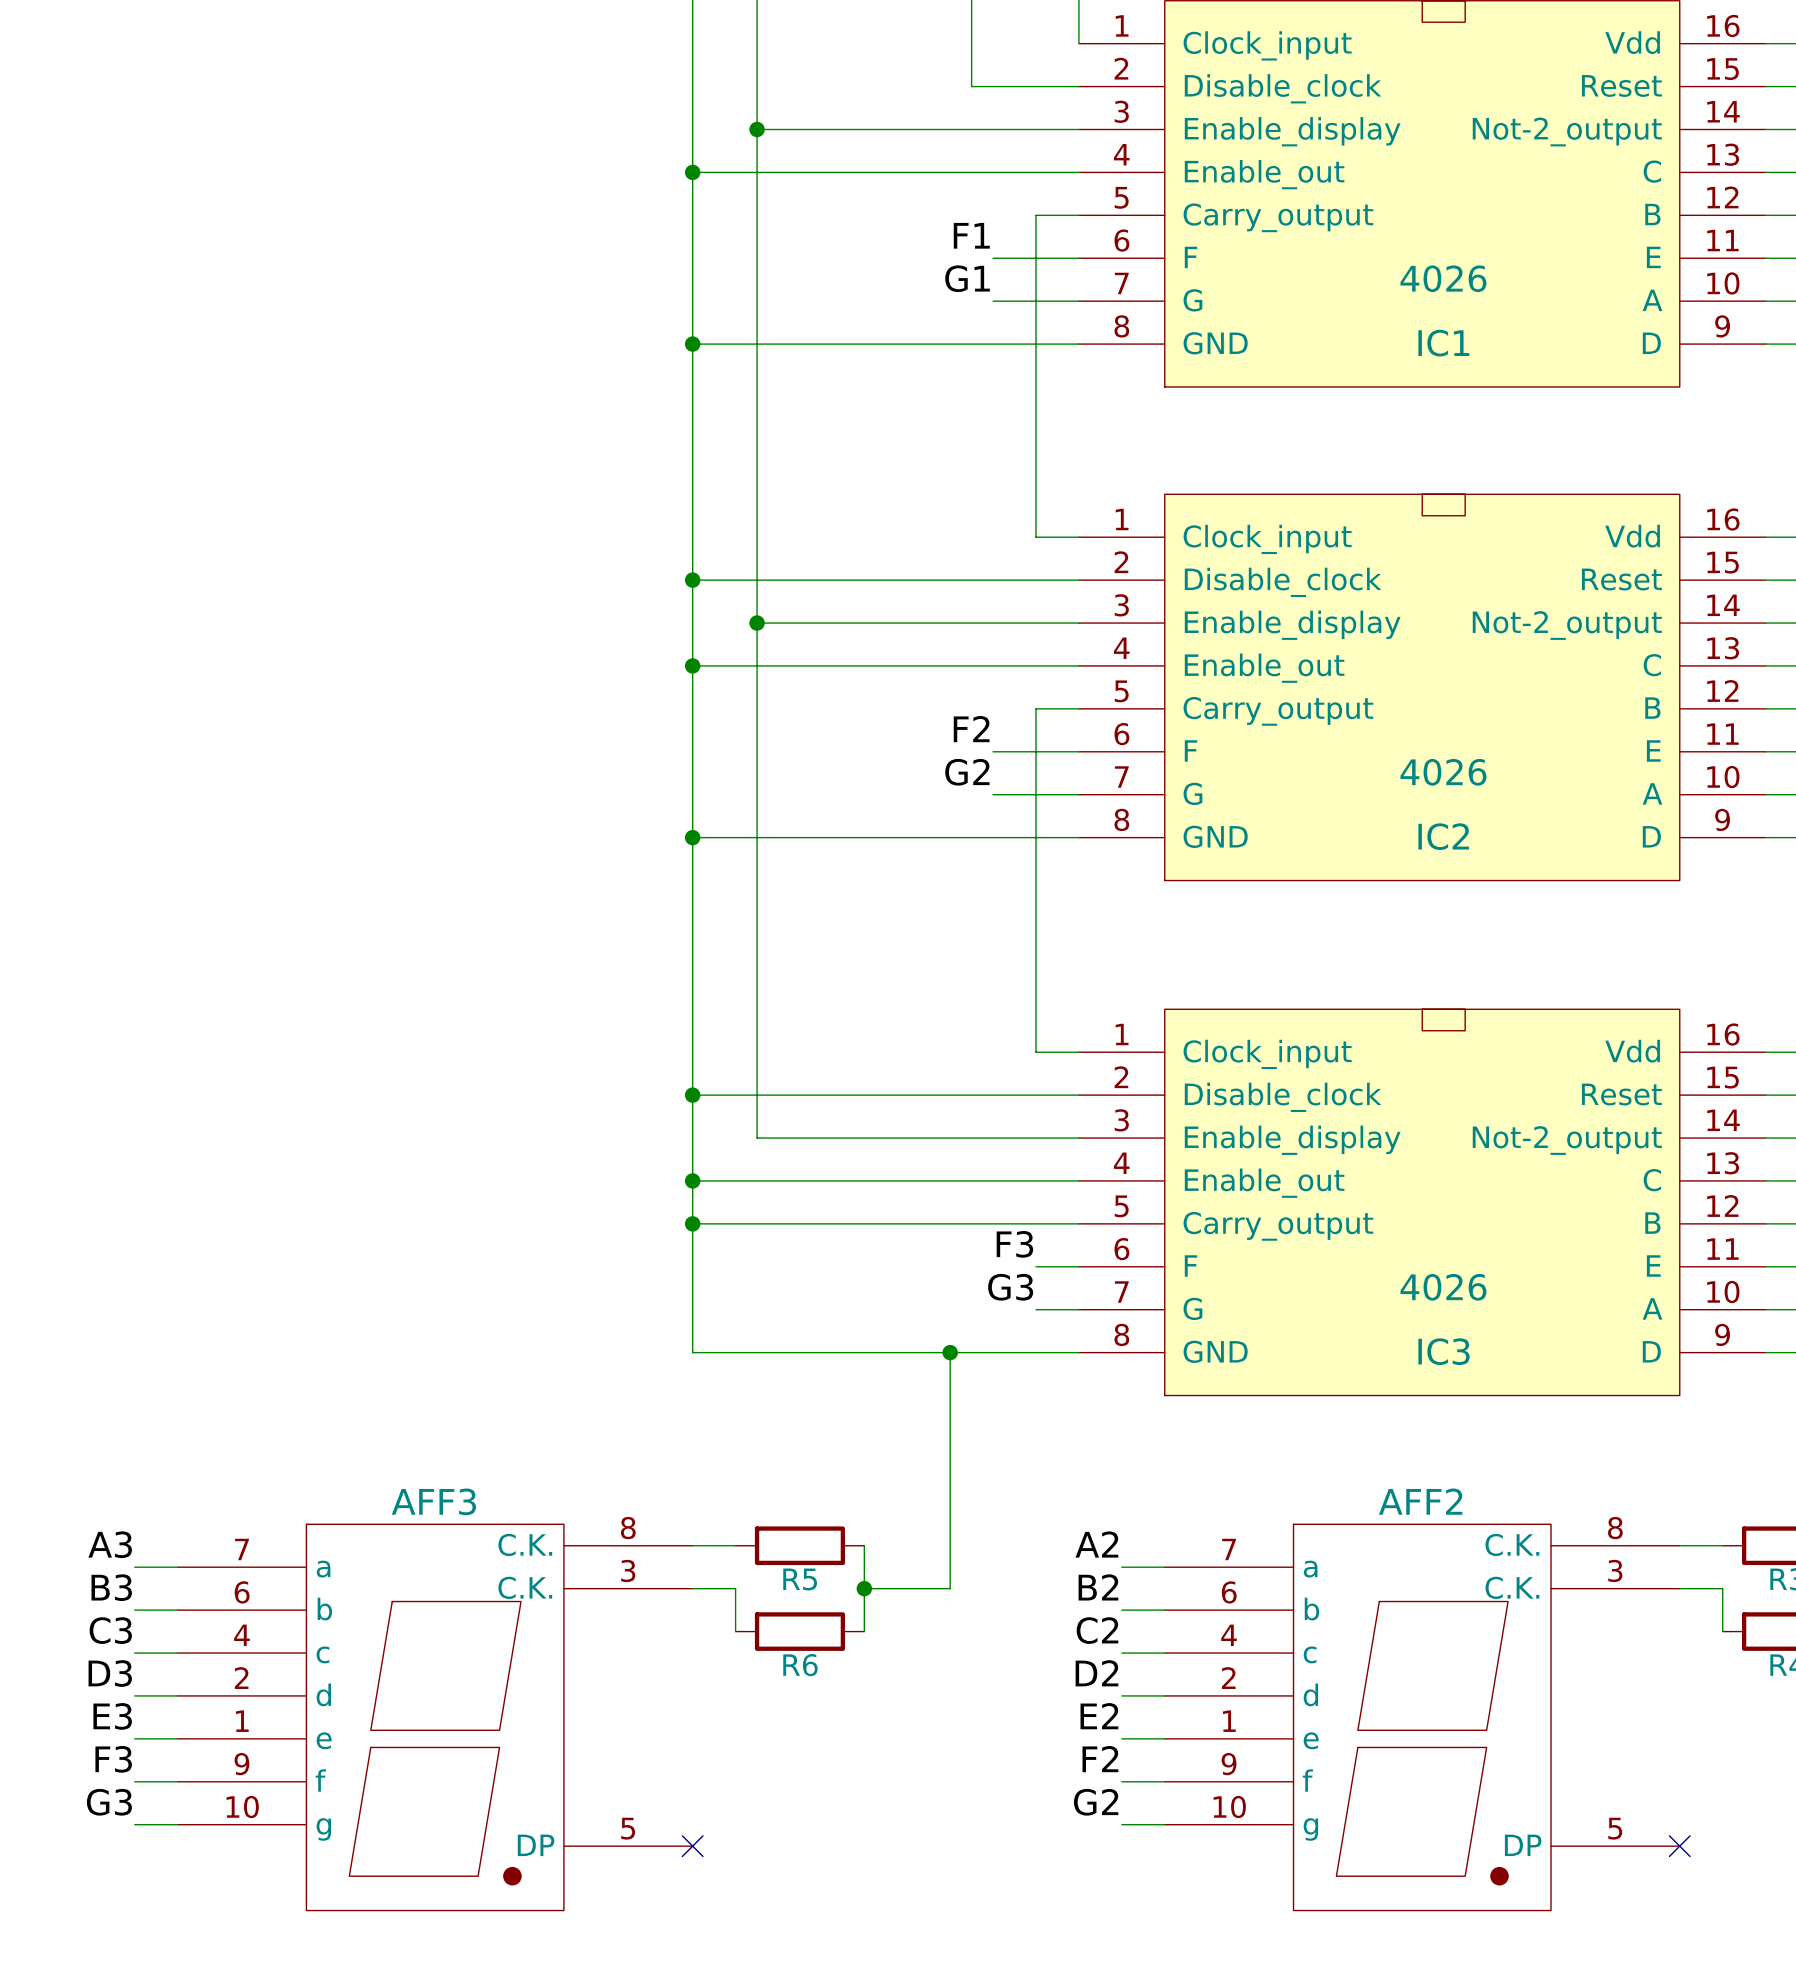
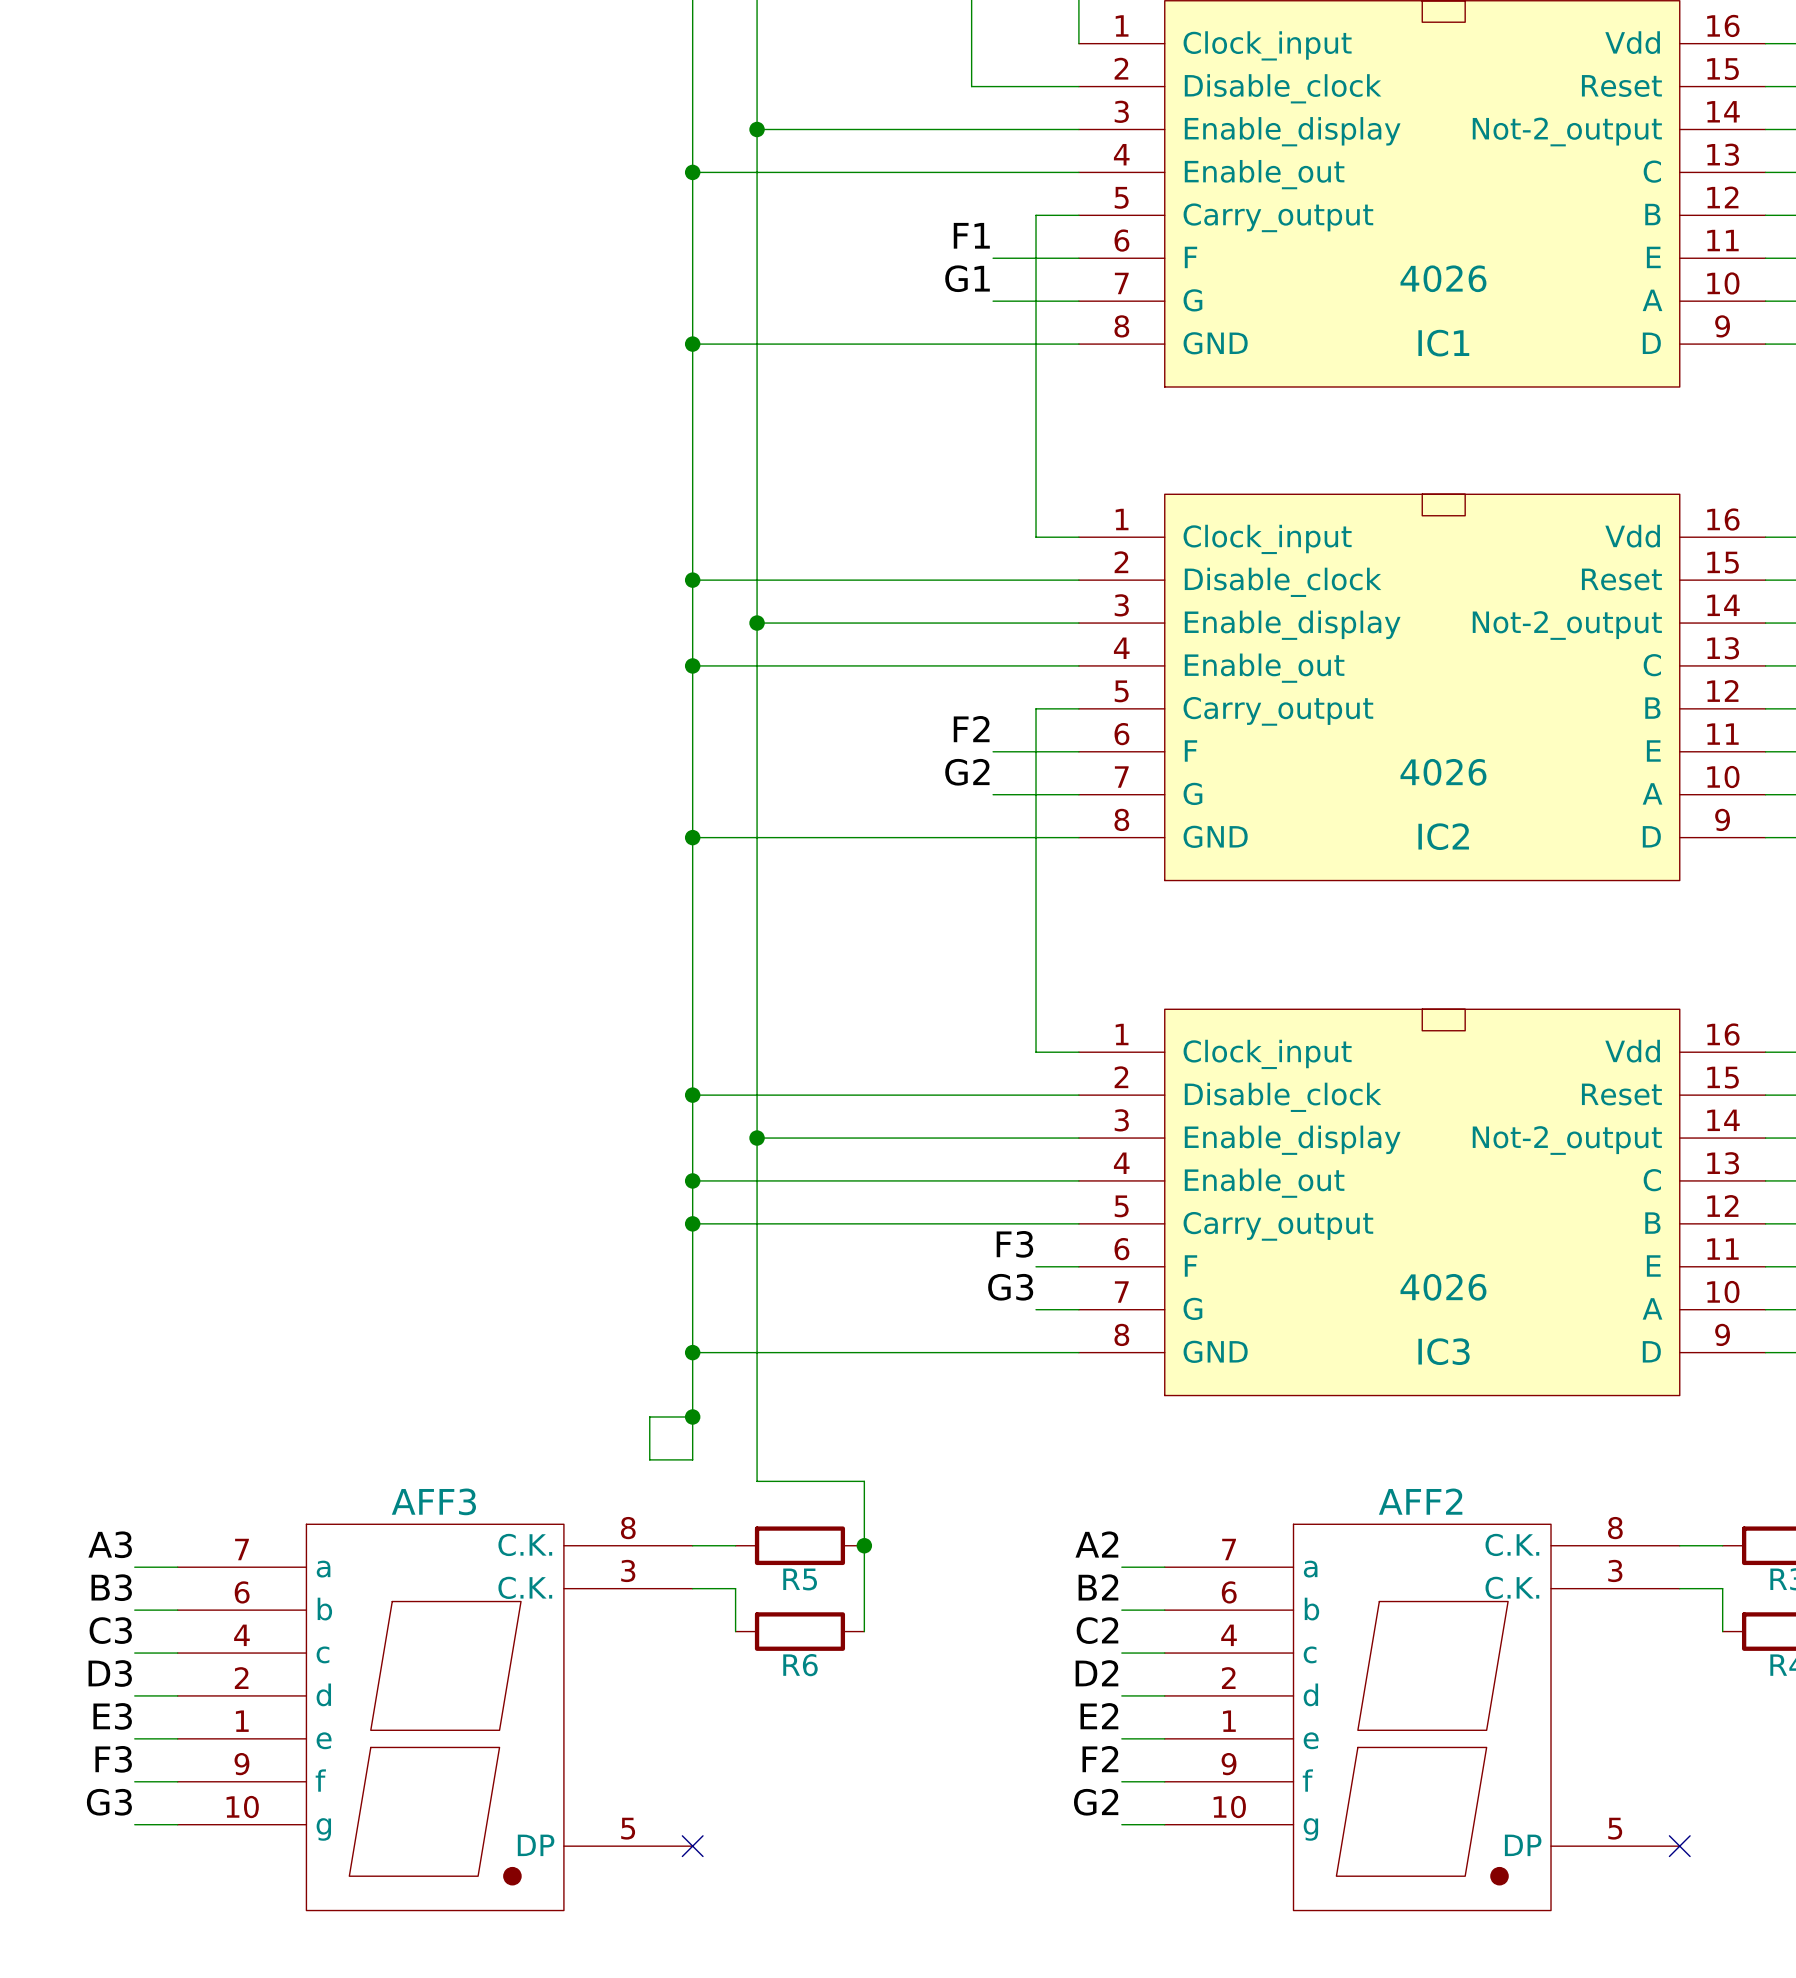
wire: none -> (757, 1138) (757, 1481) (864, 1481) (864, 1545)
junction: none -> (757, 1138)
wire: none -> (692, 1352) (692, 1459) (649, 1459) (649, 1416) (692, 1416)
junction: none -> (692, 1352)
wire: (950, 1352) (950, 1588) (864, 1588) -> none
junction: (950, 1352) -> none
junction: none -> (692, 1416)
junction position: (864, 1588) -> (864, 1545)

